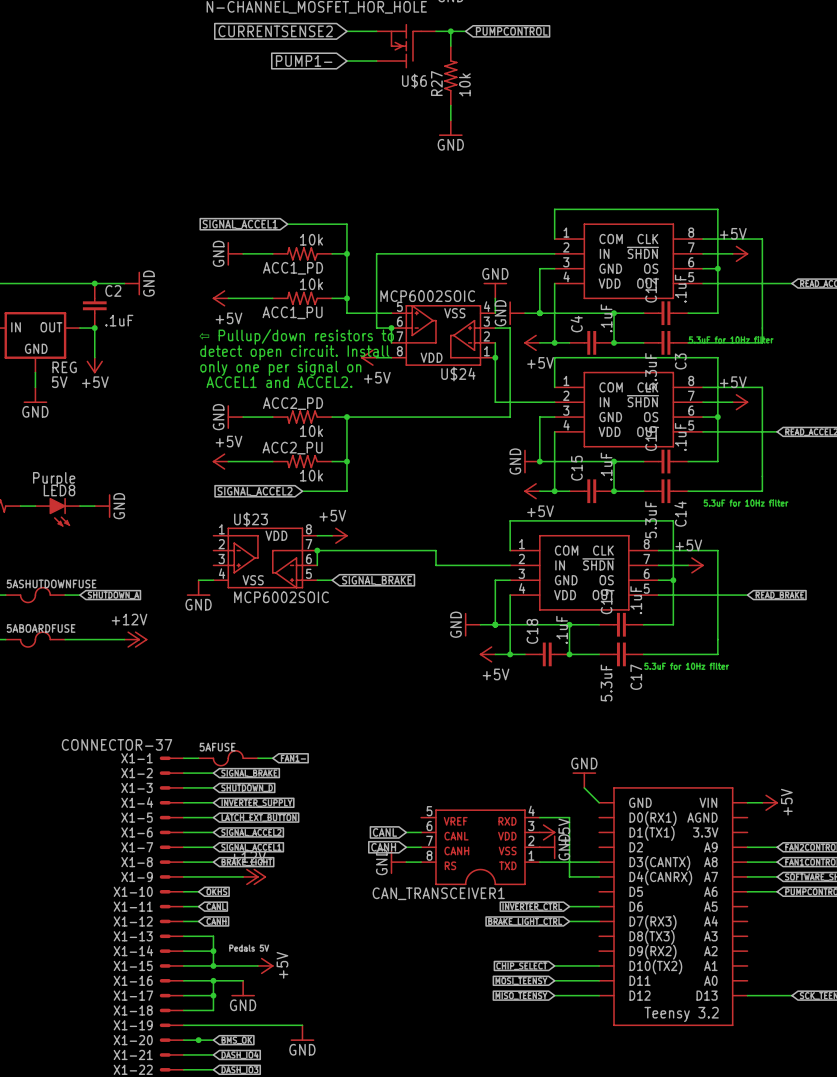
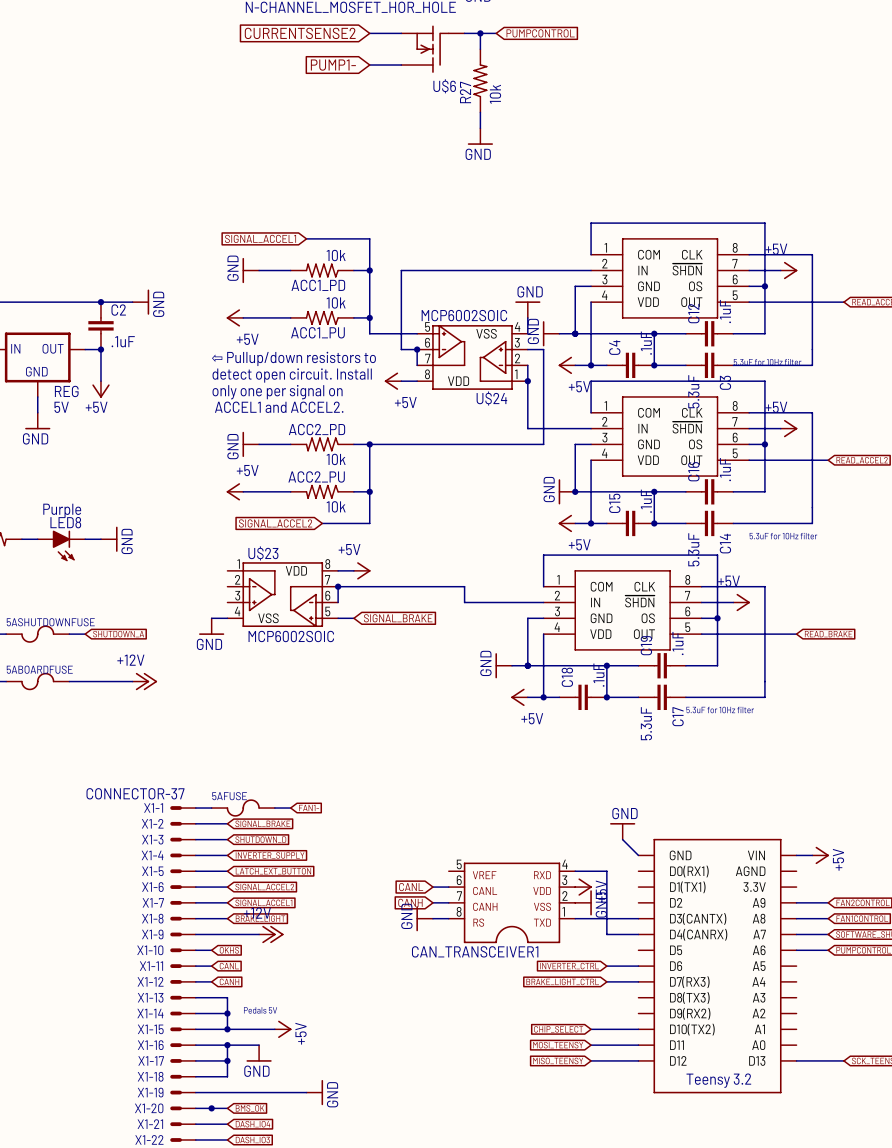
power symbol rotation: 0° (302, 1040) -> 90° counterclockwise (322, 1092)

